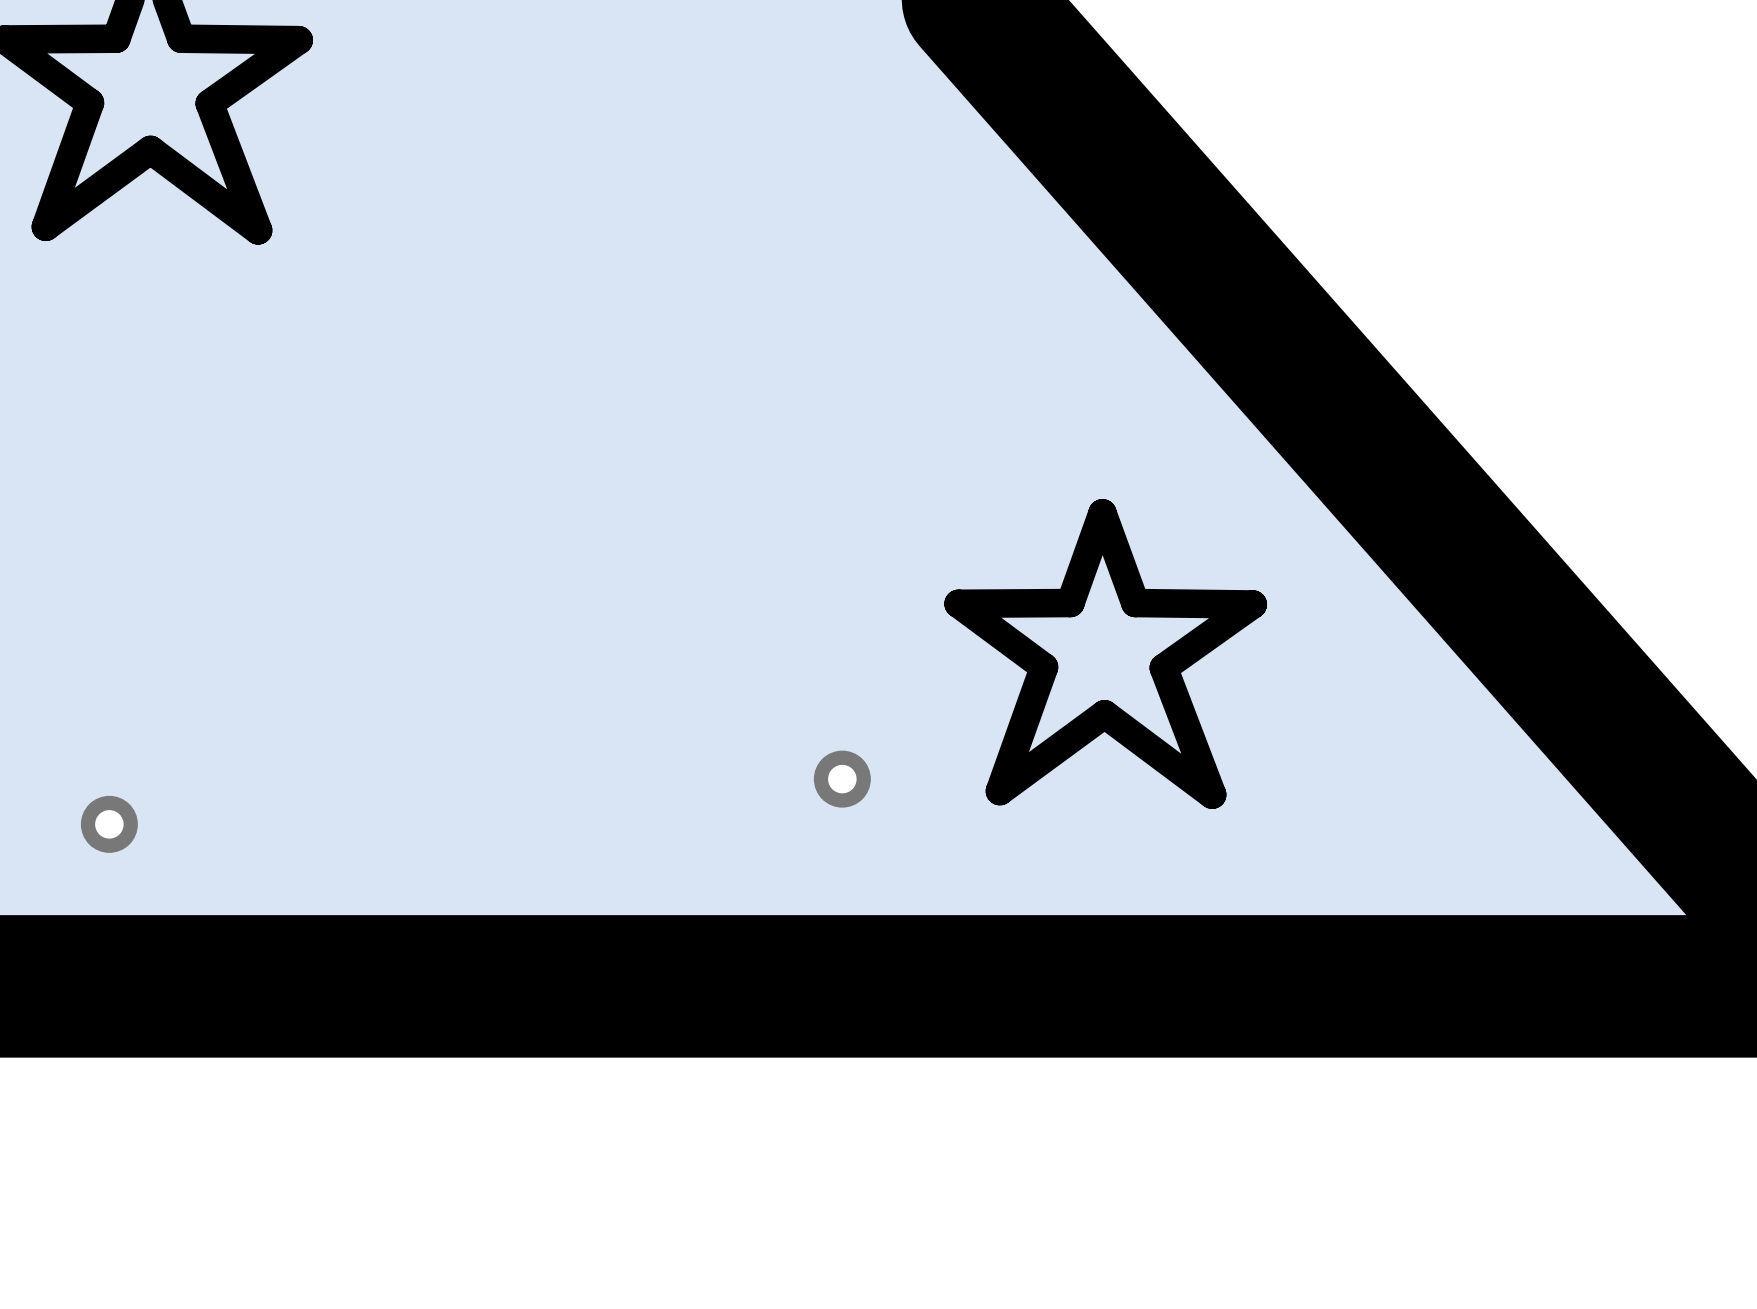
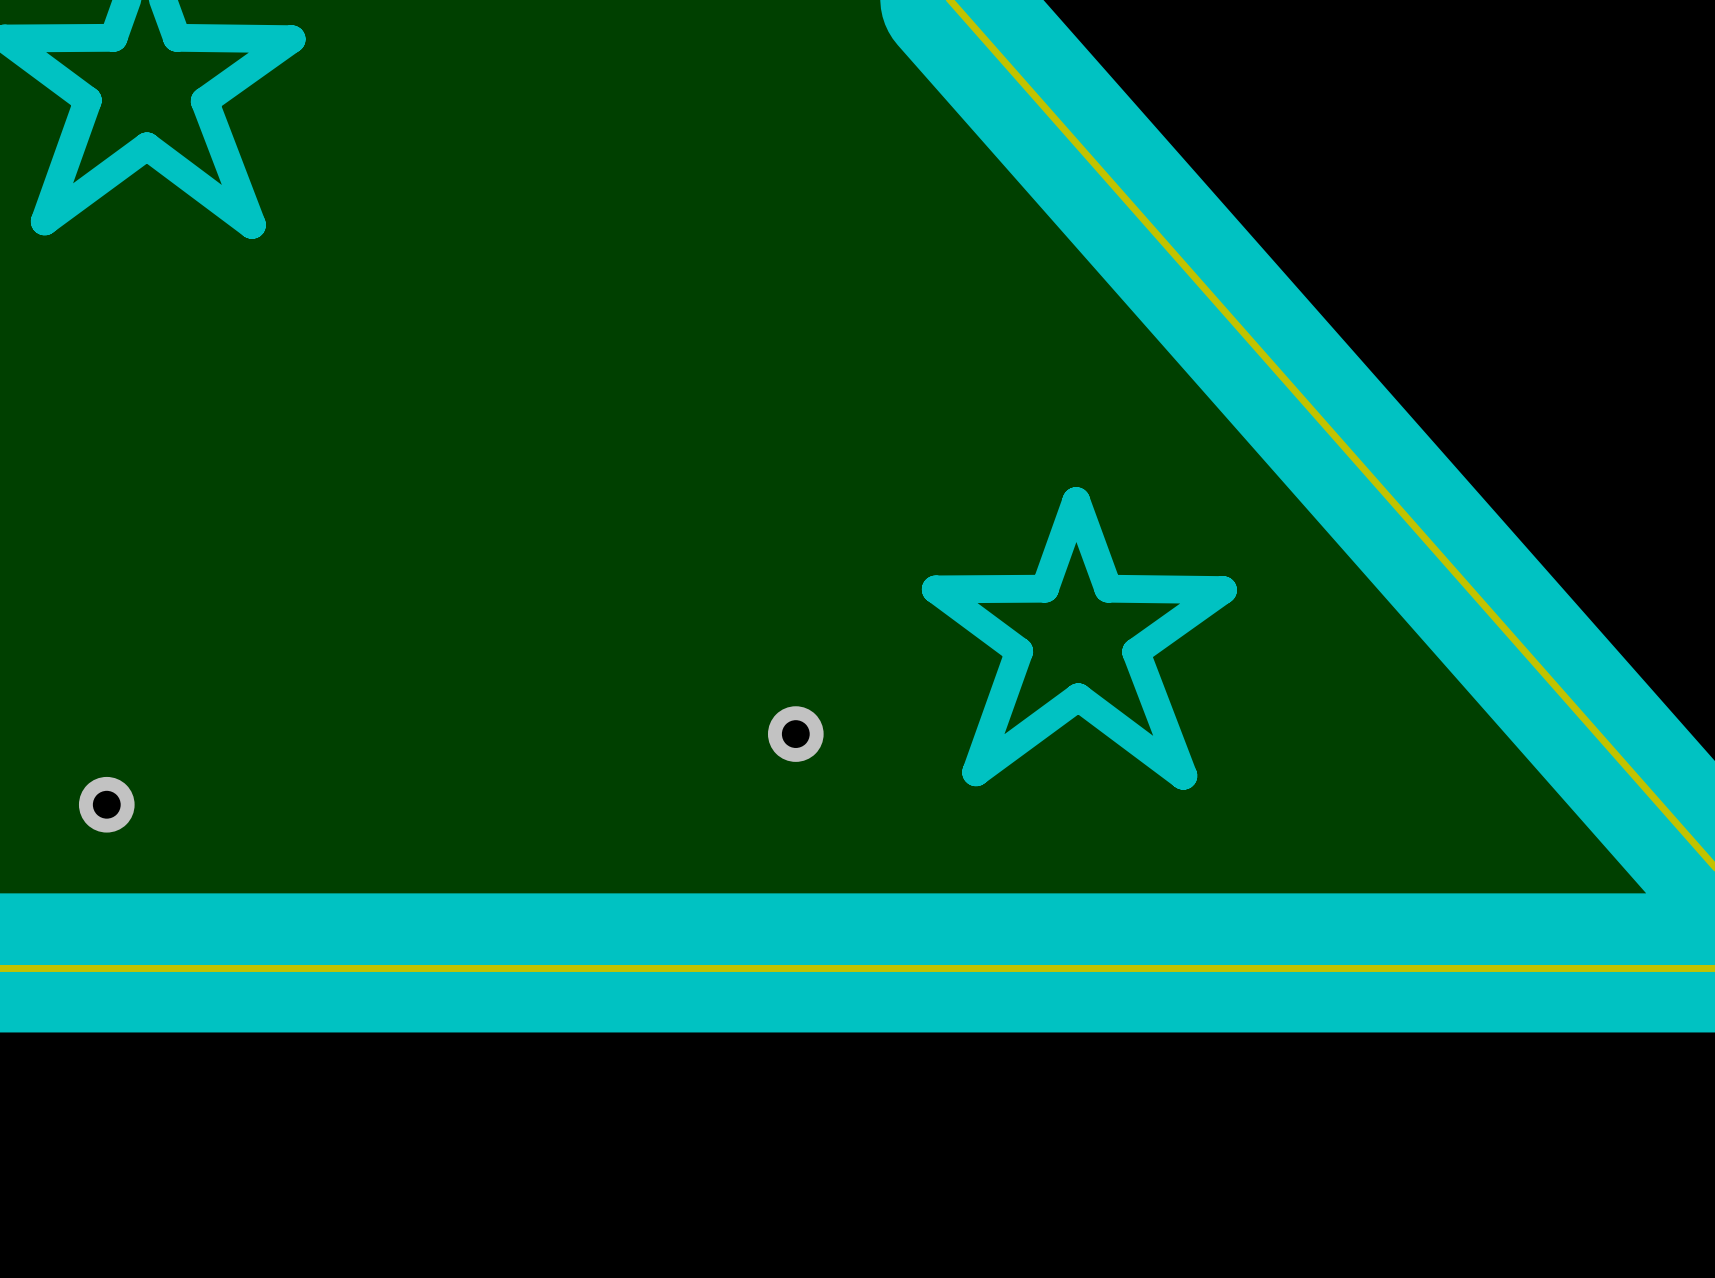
via position: (842, 779) -> (795, 734)

